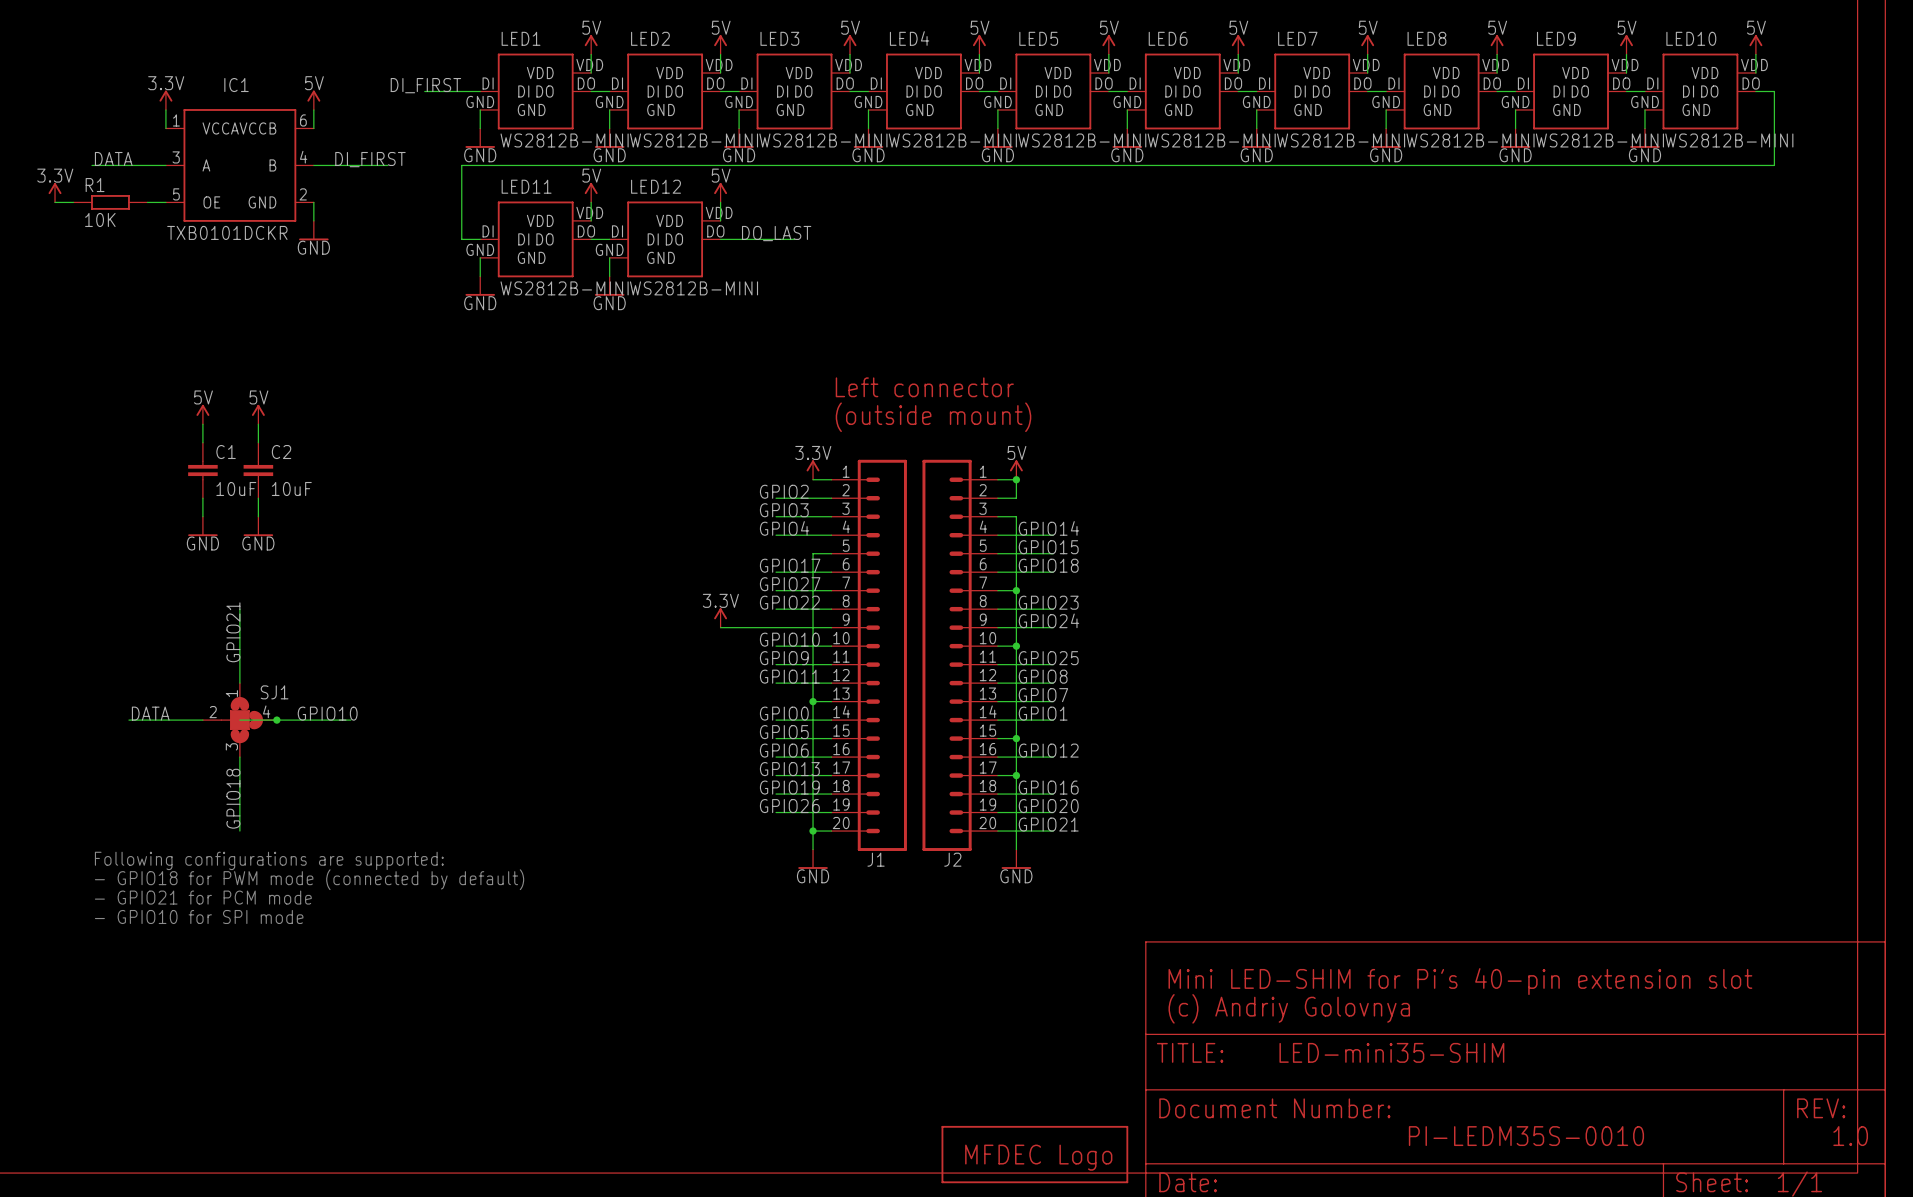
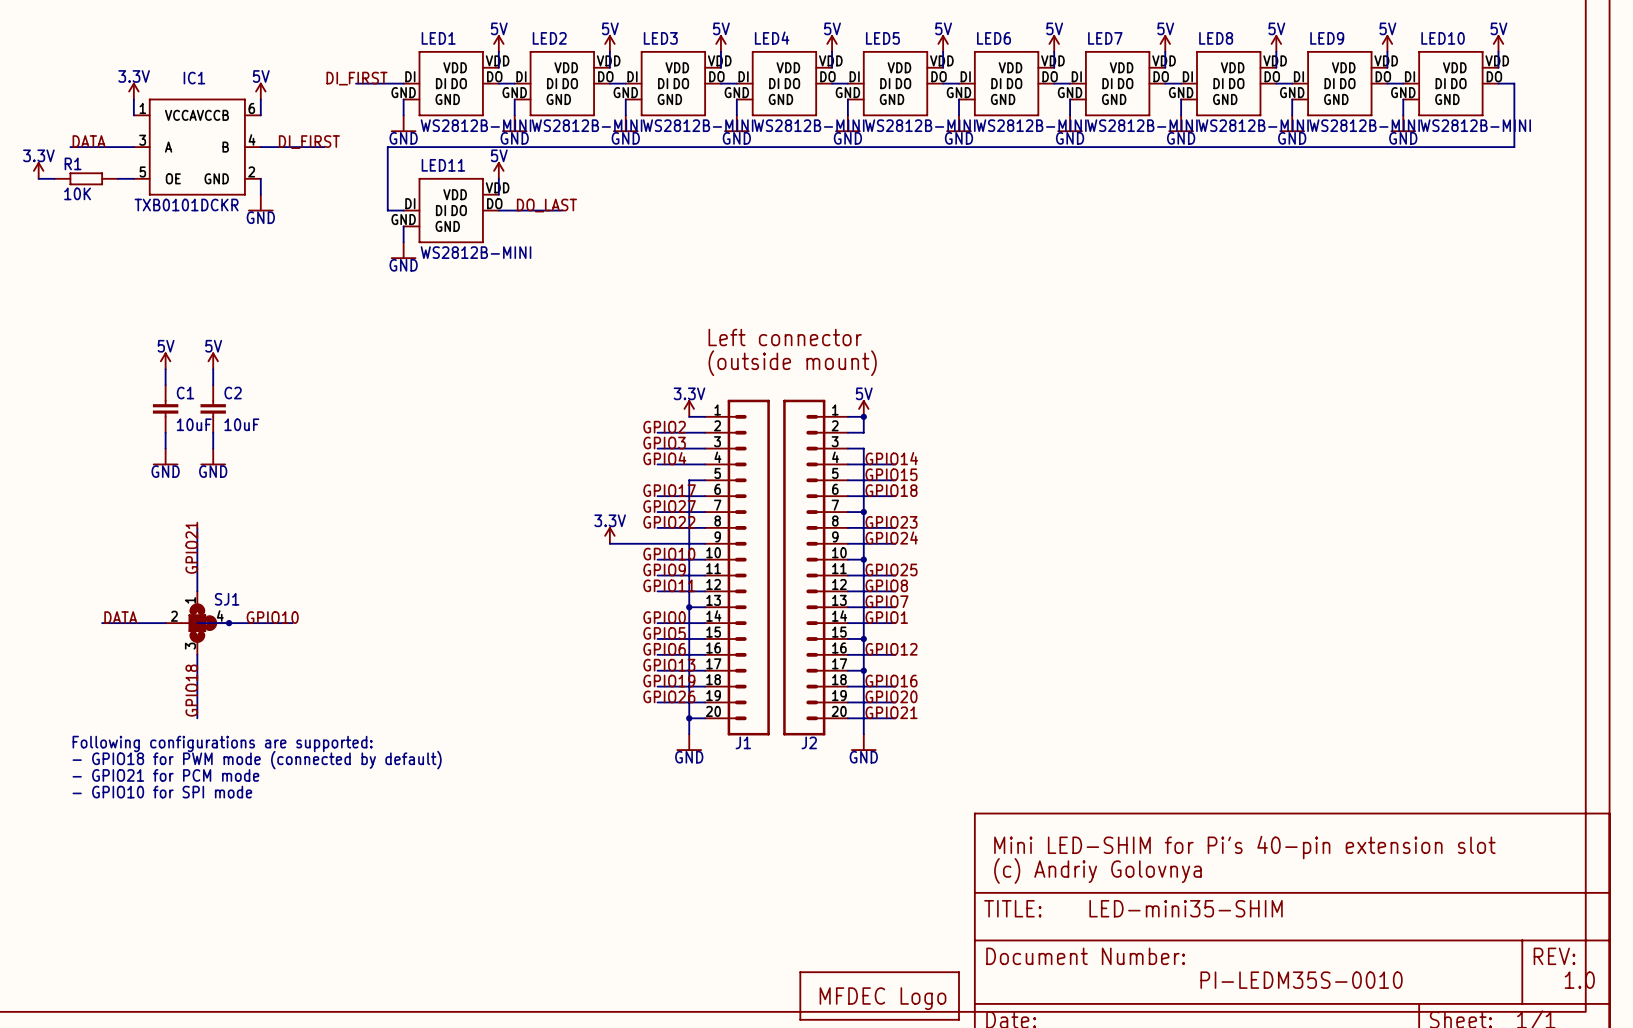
power symbol: 5V (720, 192) -> none
wire: (720, 202) (720, 220) -> none
label position: DO_LAST (776, 233) -> DO_LAST (546, 205)
wire: none -> (514, 210) (562, 210)
LED12: WS2812B-MINI (665, 239) -> none
wire: (720, 239) (794, 239) -> none
wire: (609, 257) (609, 276) -> none
power symbol: GND (609, 286) -> none

